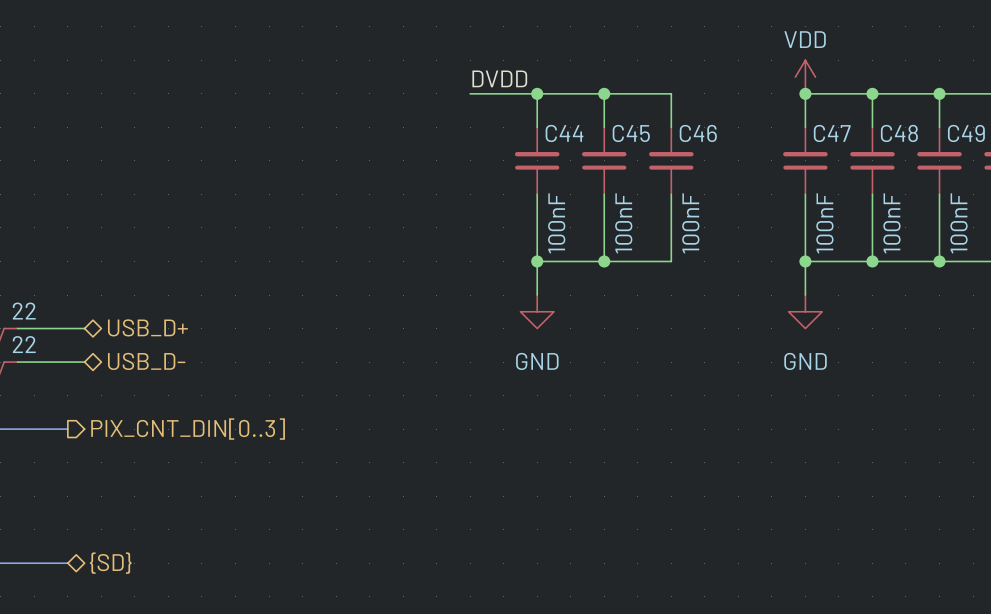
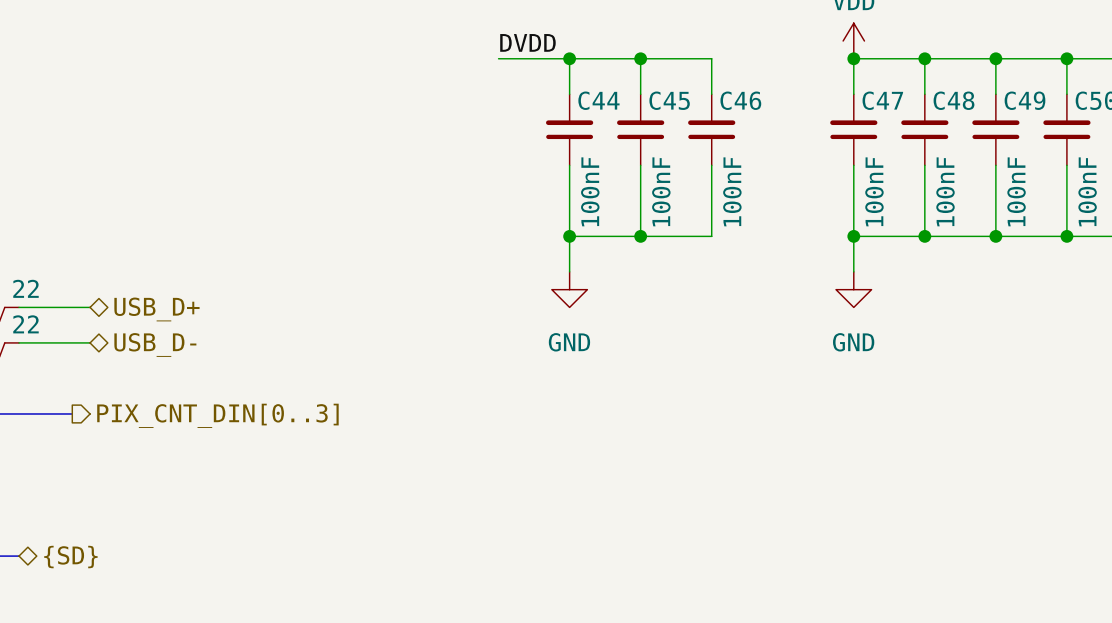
bus: (17, 563) (67, 563) -> none
hierarchical label position: {SD} (110, 563) -> {SD} (70, 557)

